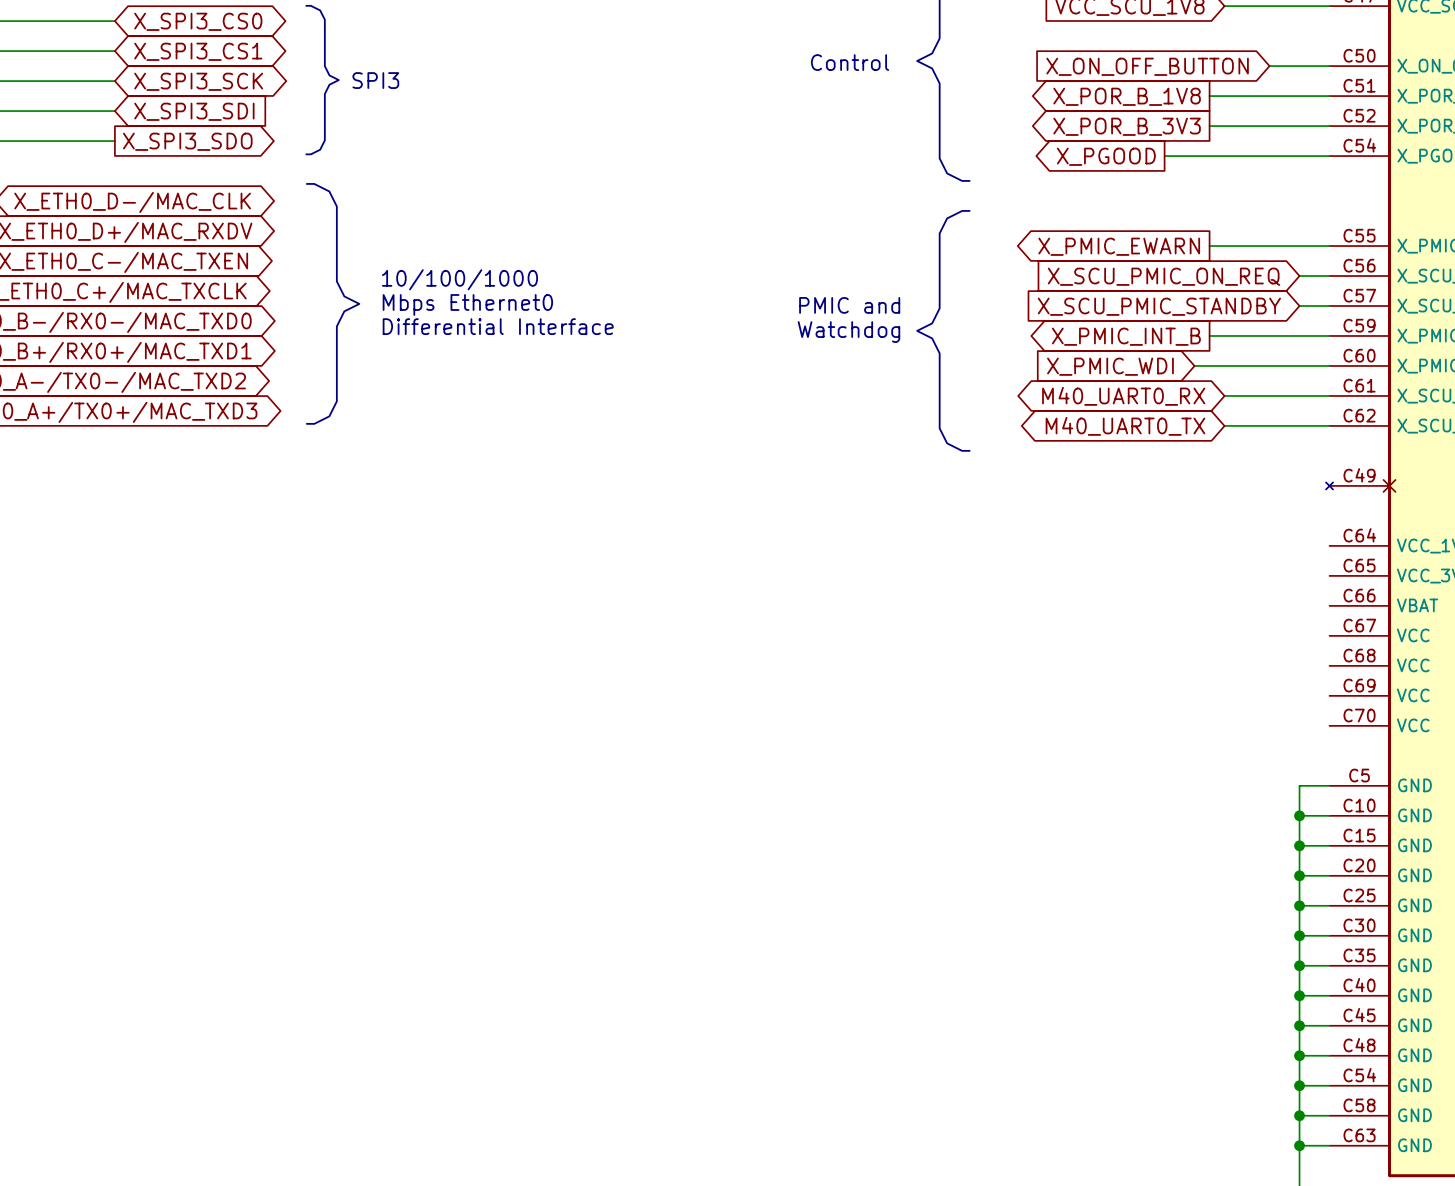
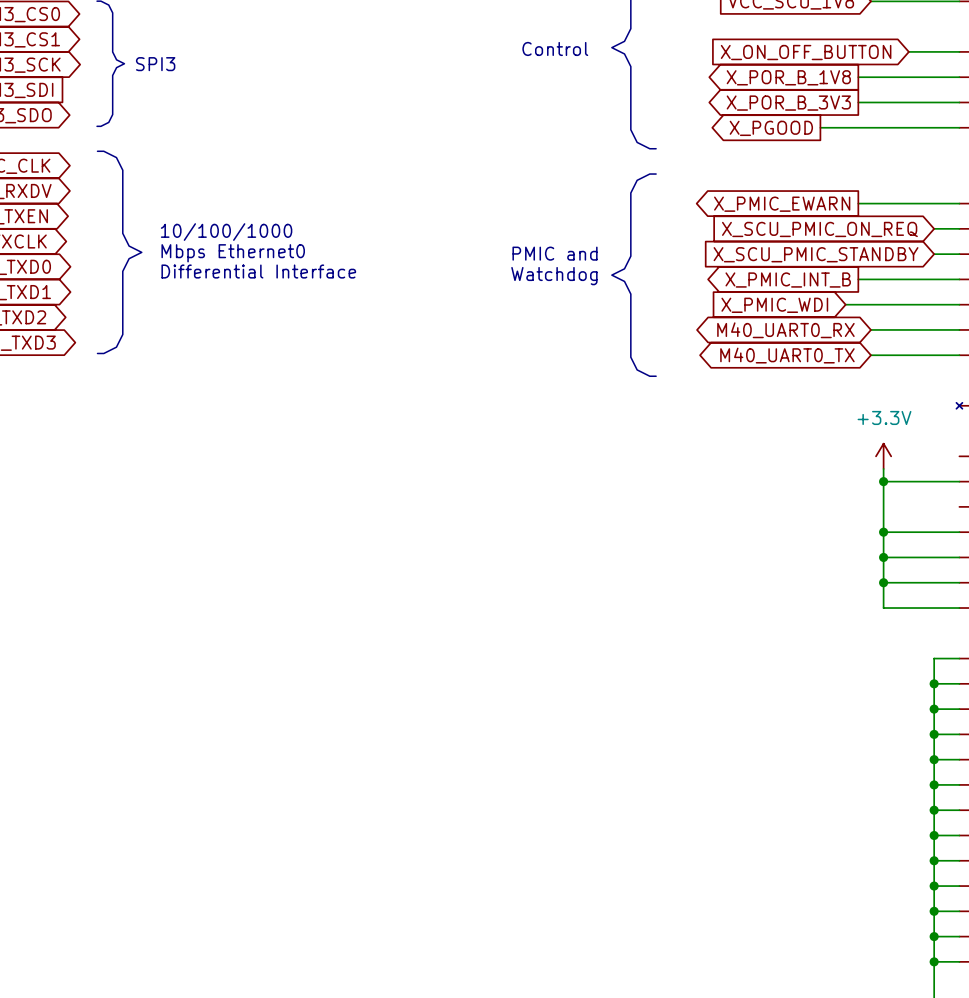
power symbol: none -> +3.3V (883, 456)
wire: none -> (883, 468) (883, 608) (959, 608)
wire: none -> (883, 481) (959, 481)
junction: none -> (883, 481)
wire: none -> (883, 532) (959, 532)
junction: none -> (883, 532)
wire: none -> (883, 557) (959, 557)
junction: none -> (883, 557)
wire: none -> (883, 582) (959, 582)
junction: none -> (883, 582)

